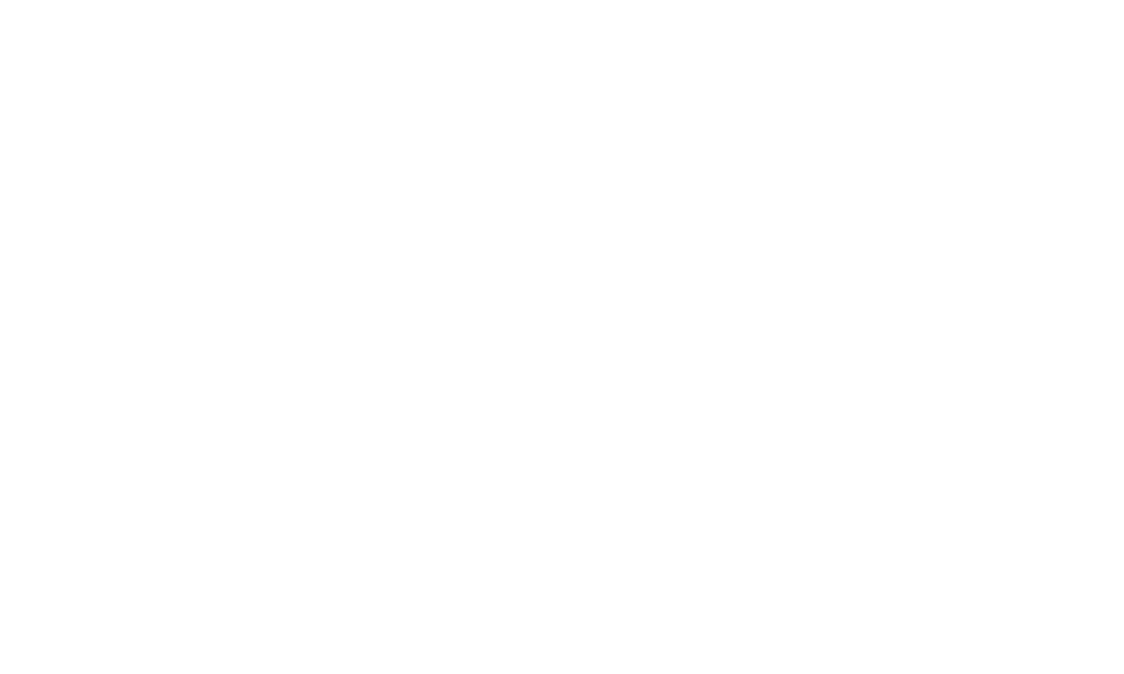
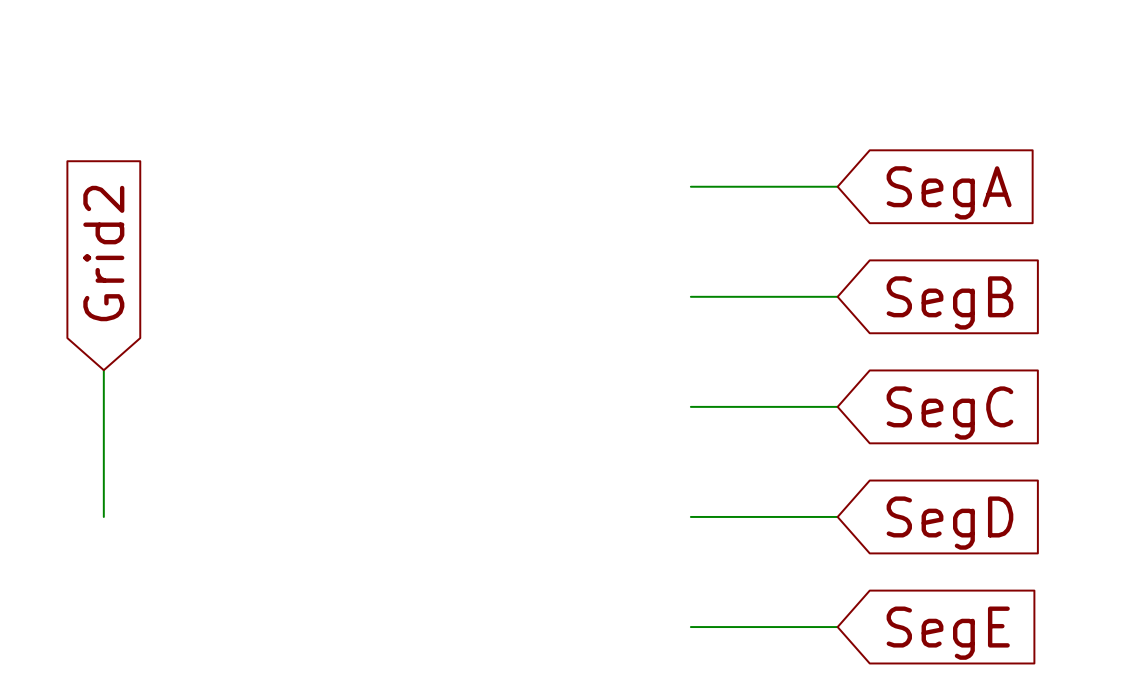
wire: none -> (690, 186) (837, 186)
global label: none -> SegA (949, 192)
global label: none -> Grid2 (103, 253)
wire: none -> (690, 296) (837, 296)
global label: none -> SegB (949, 302)
wire: none -> (103, 370) (103, 516)
wire: none -> (690, 406) (837, 406)
global label: none -> SegC (949, 413)
wire: none -> (690, 516) (837, 516)
global label: none -> SegD (949, 523)
wire: none -> (690, 627) (837, 627)
global label: none -> SegE (948, 633)

